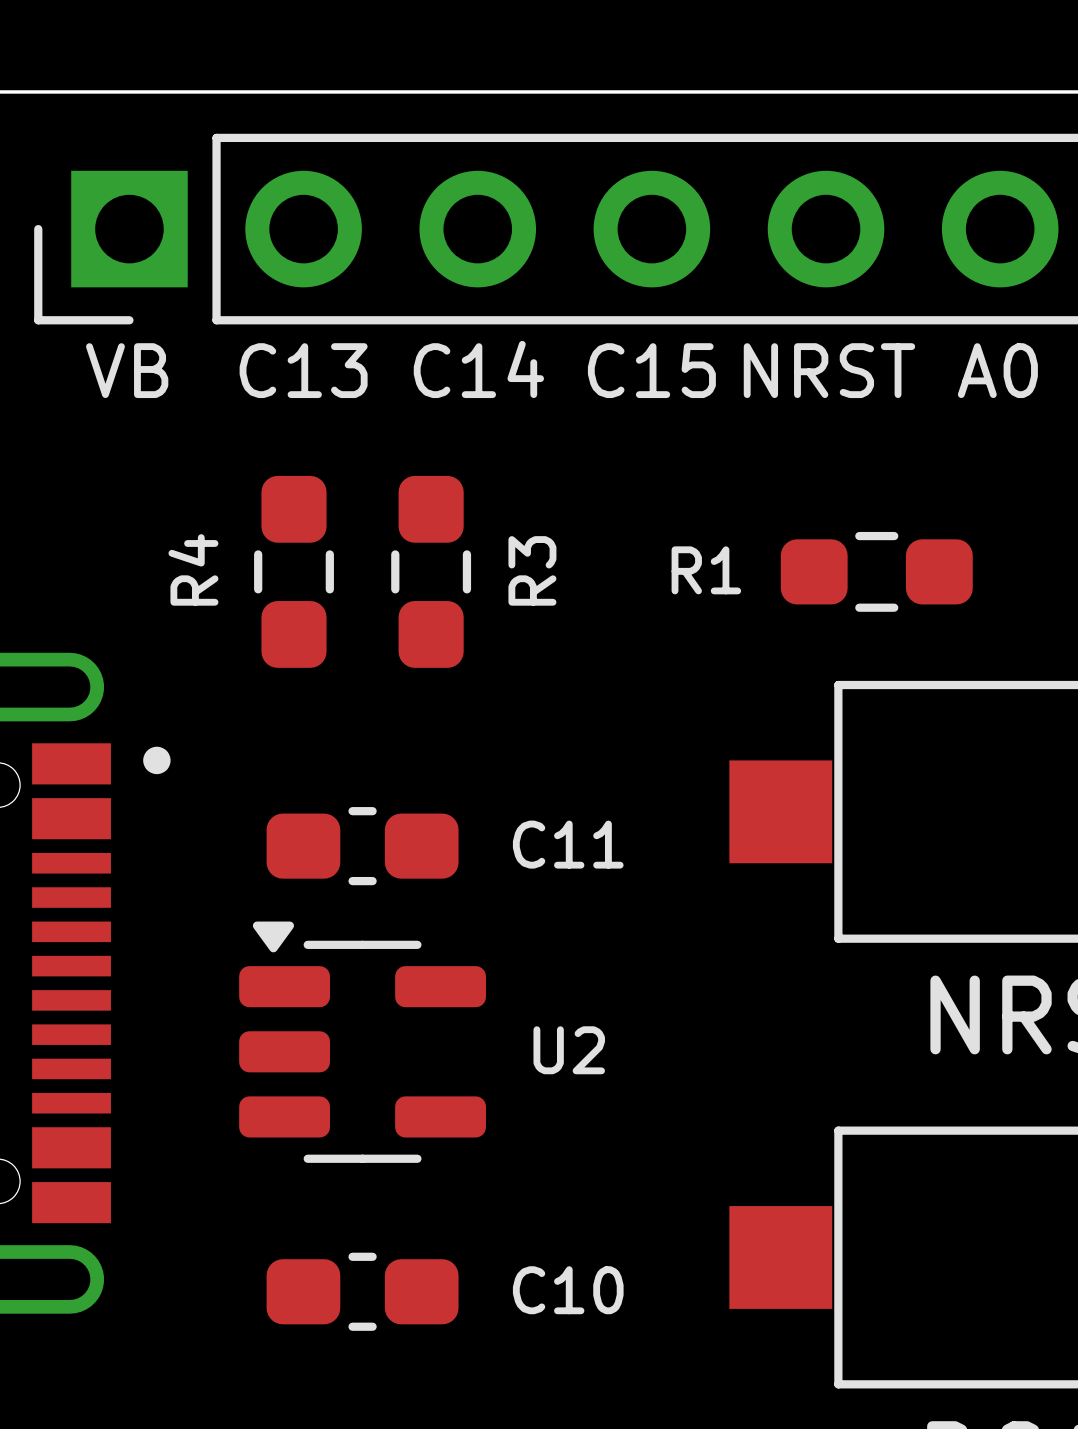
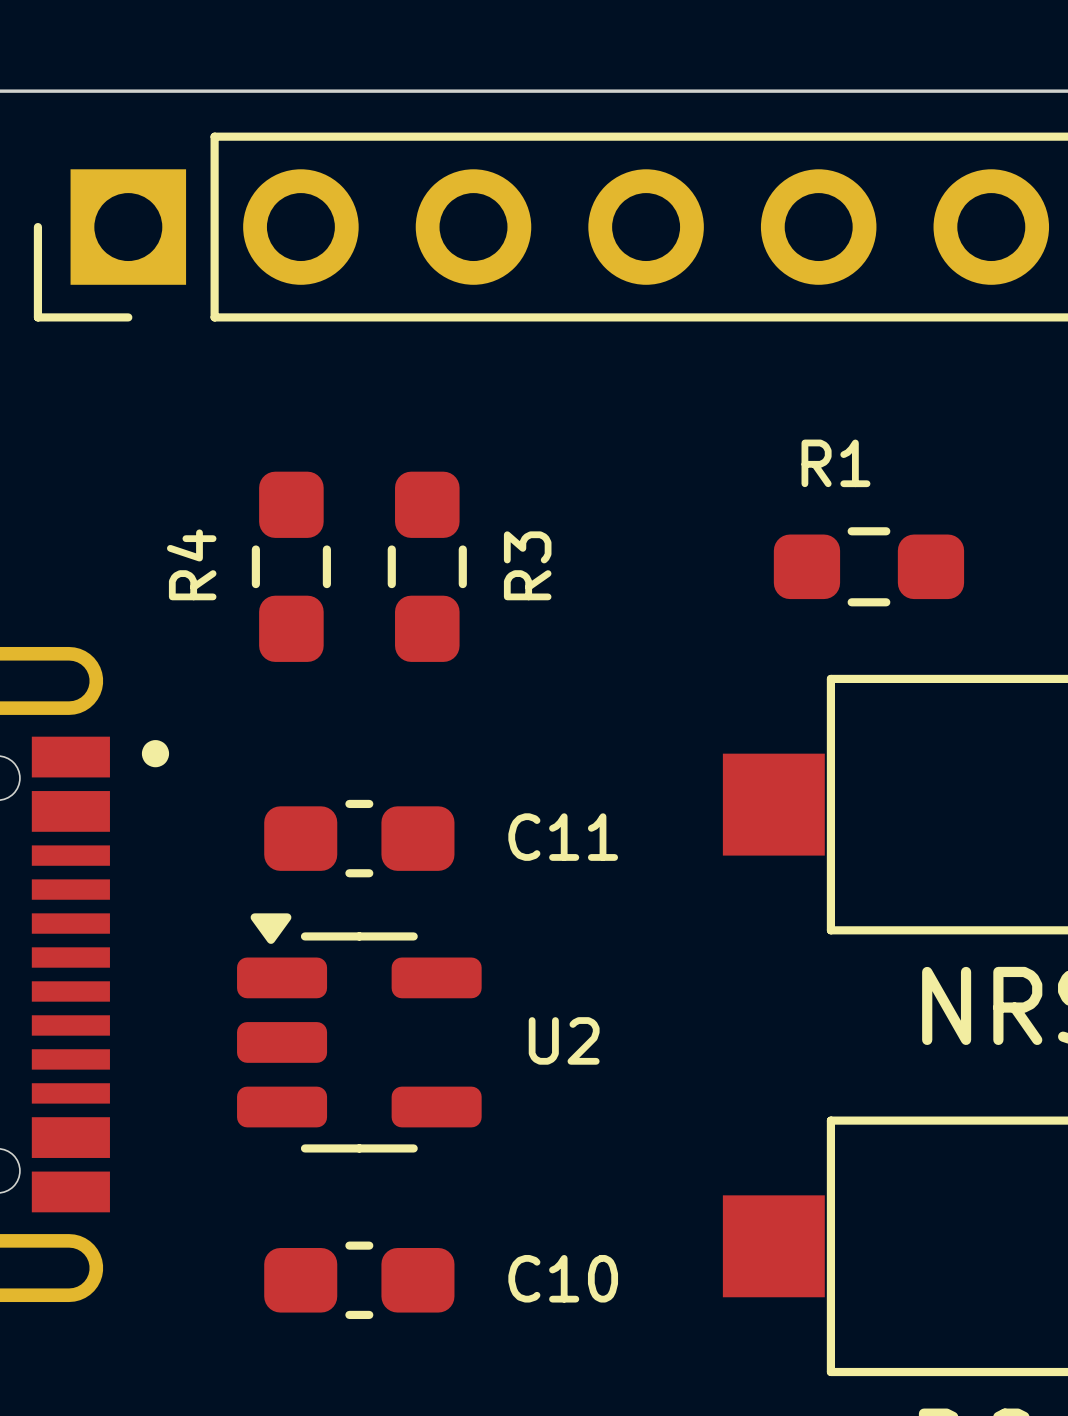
text: C14 (478, 369) -> none
text: VB (127, 370) -> none
text: C13 (303, 370) -> none
text: C15 (651, 370) -> none
text: NRST (829, 370) -> none
text: A0 (997, 370) -> none
R1 name position: R1 (706, 570) -> R1 (835, 463)

